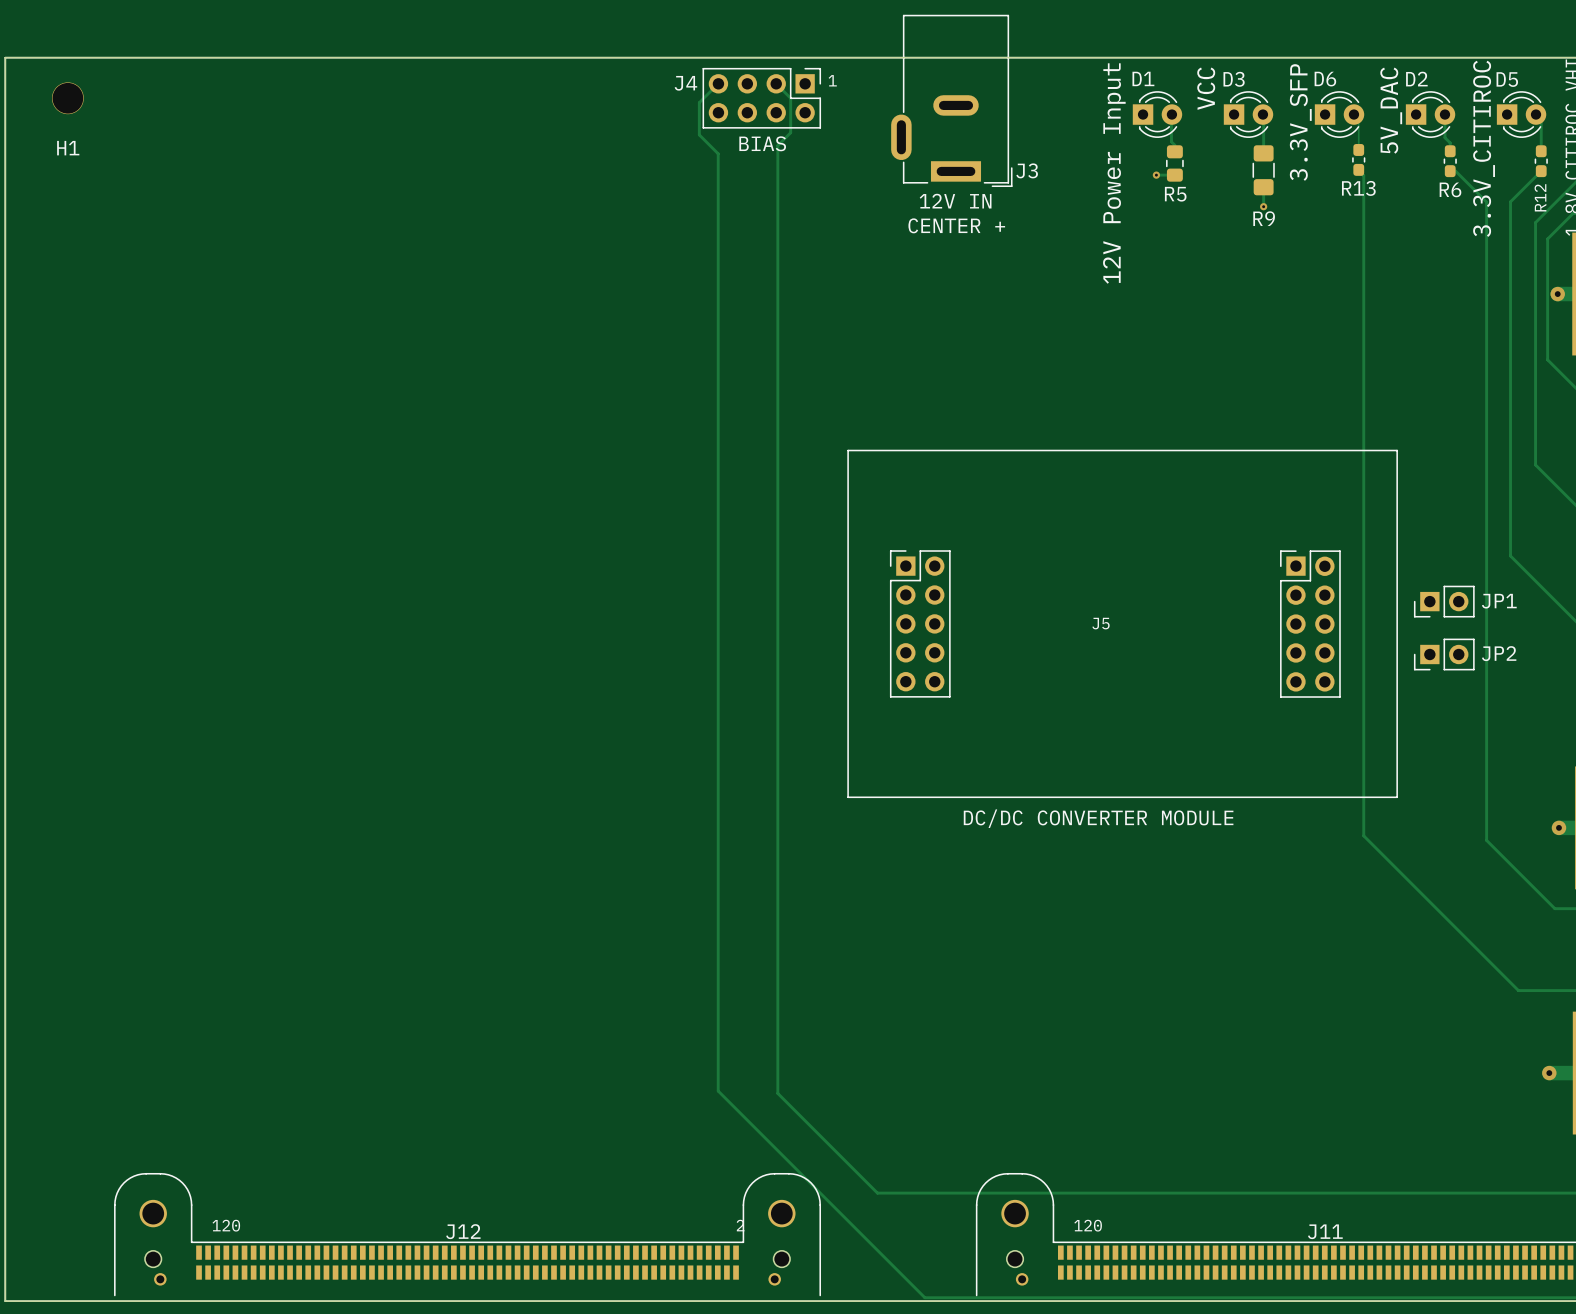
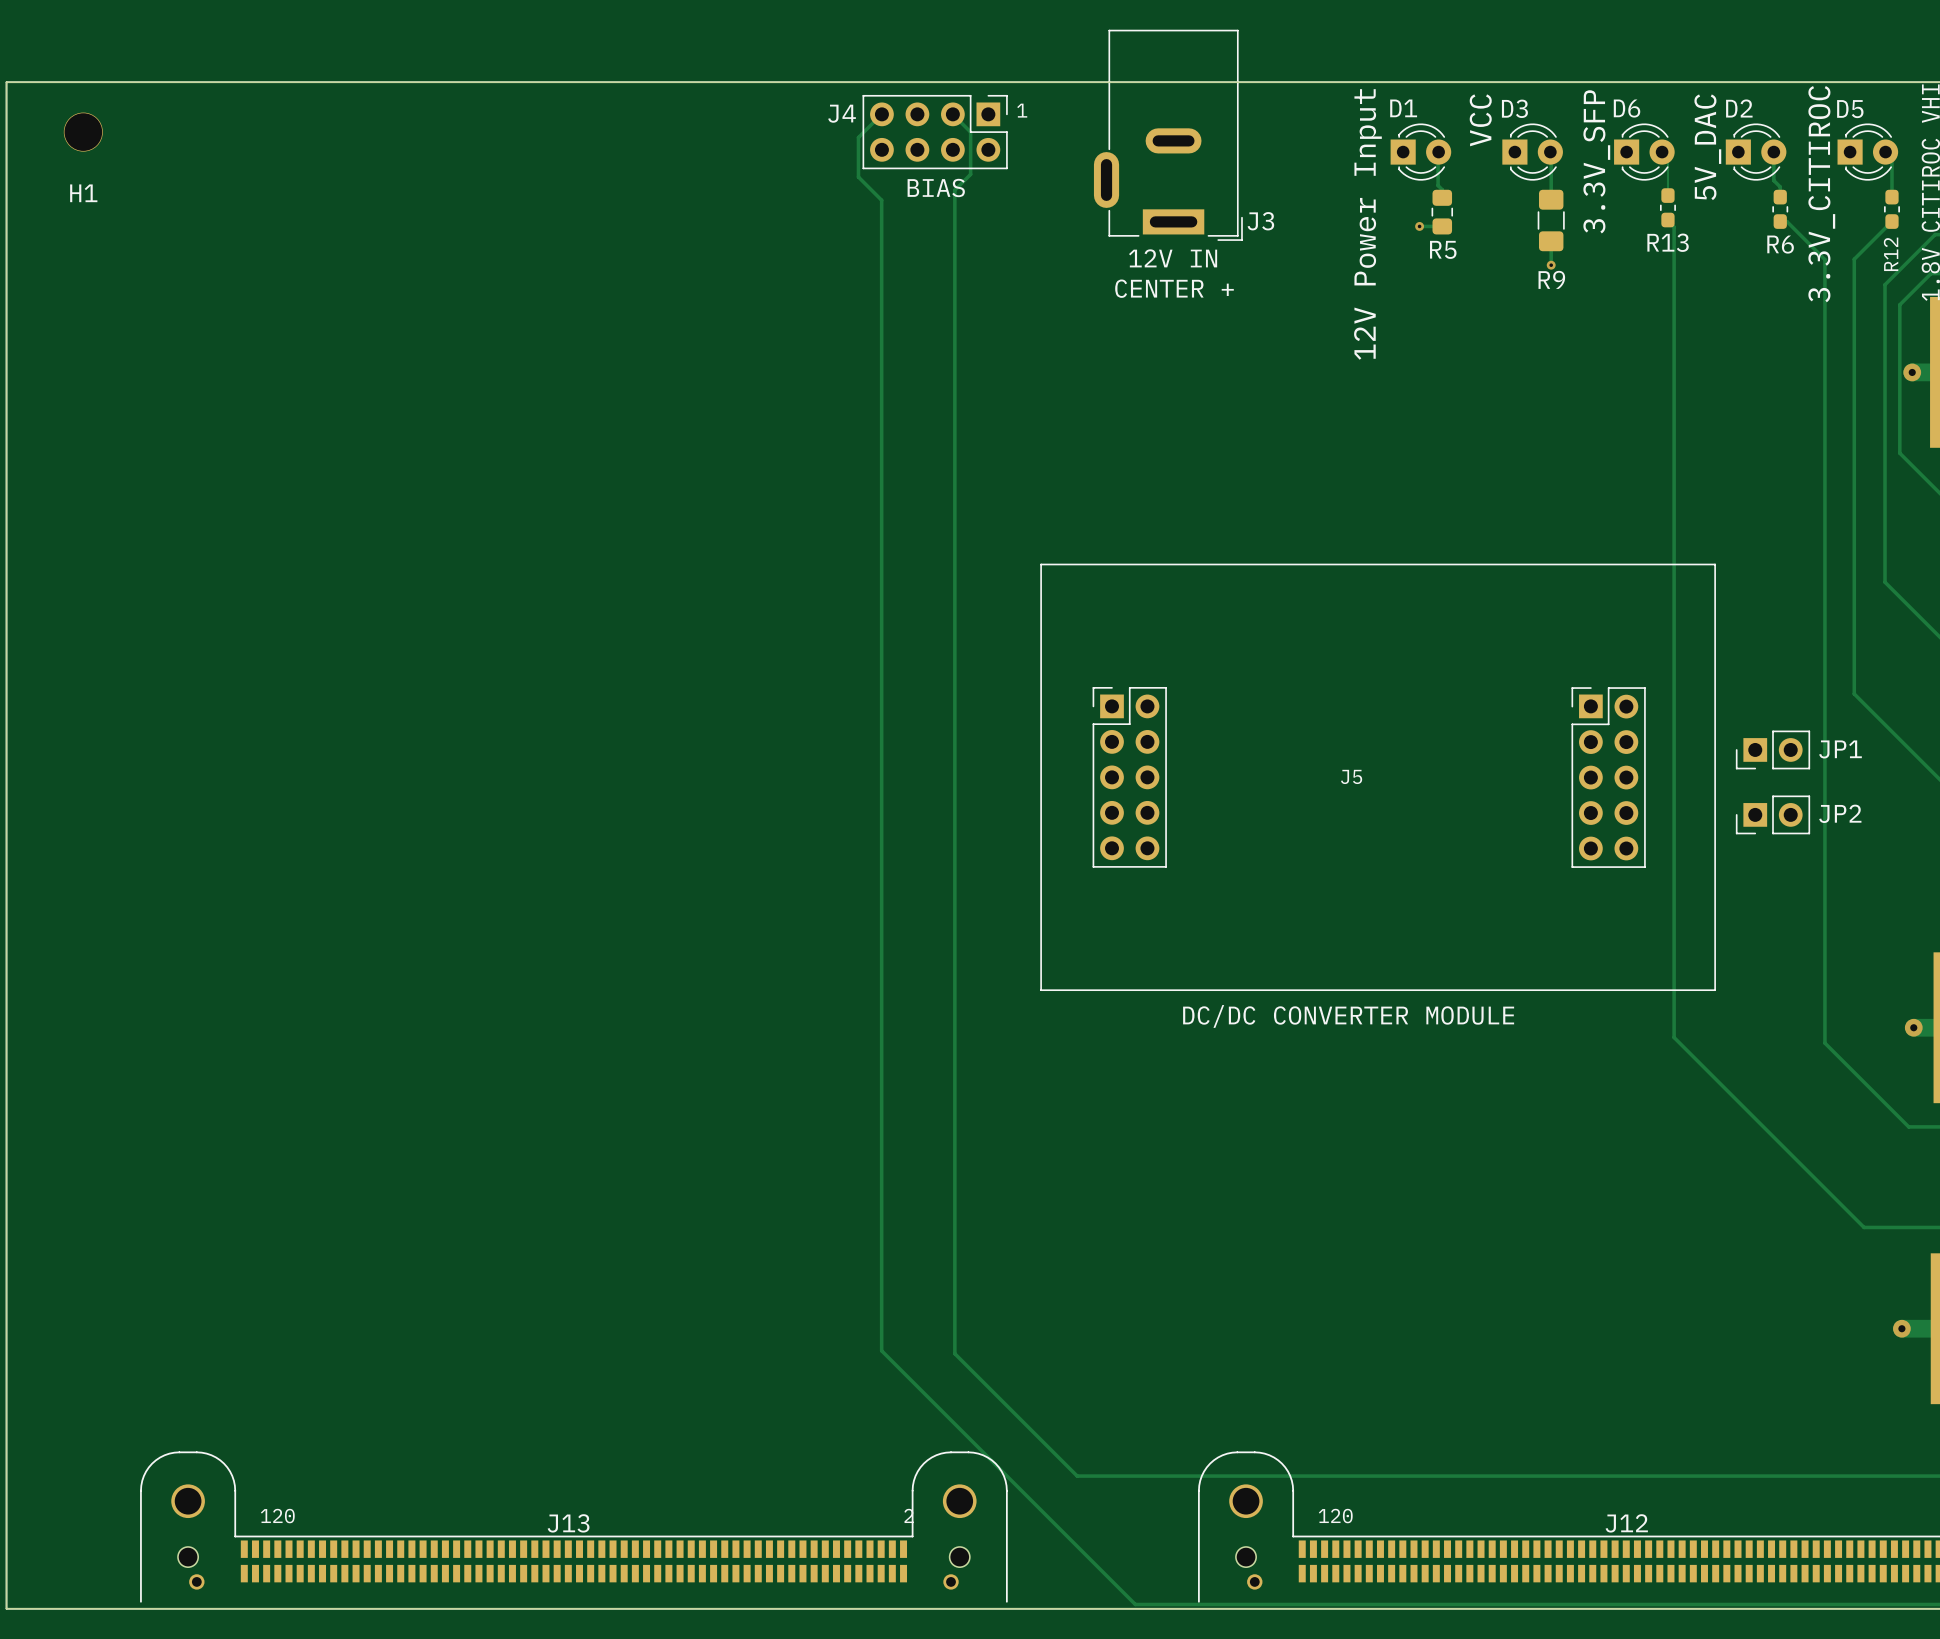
J12 name: J12 (463, 1231) -> J13 (568, 1523)
J11 name: J11 (1325, 1231) -> J12 (1626, 1523)

